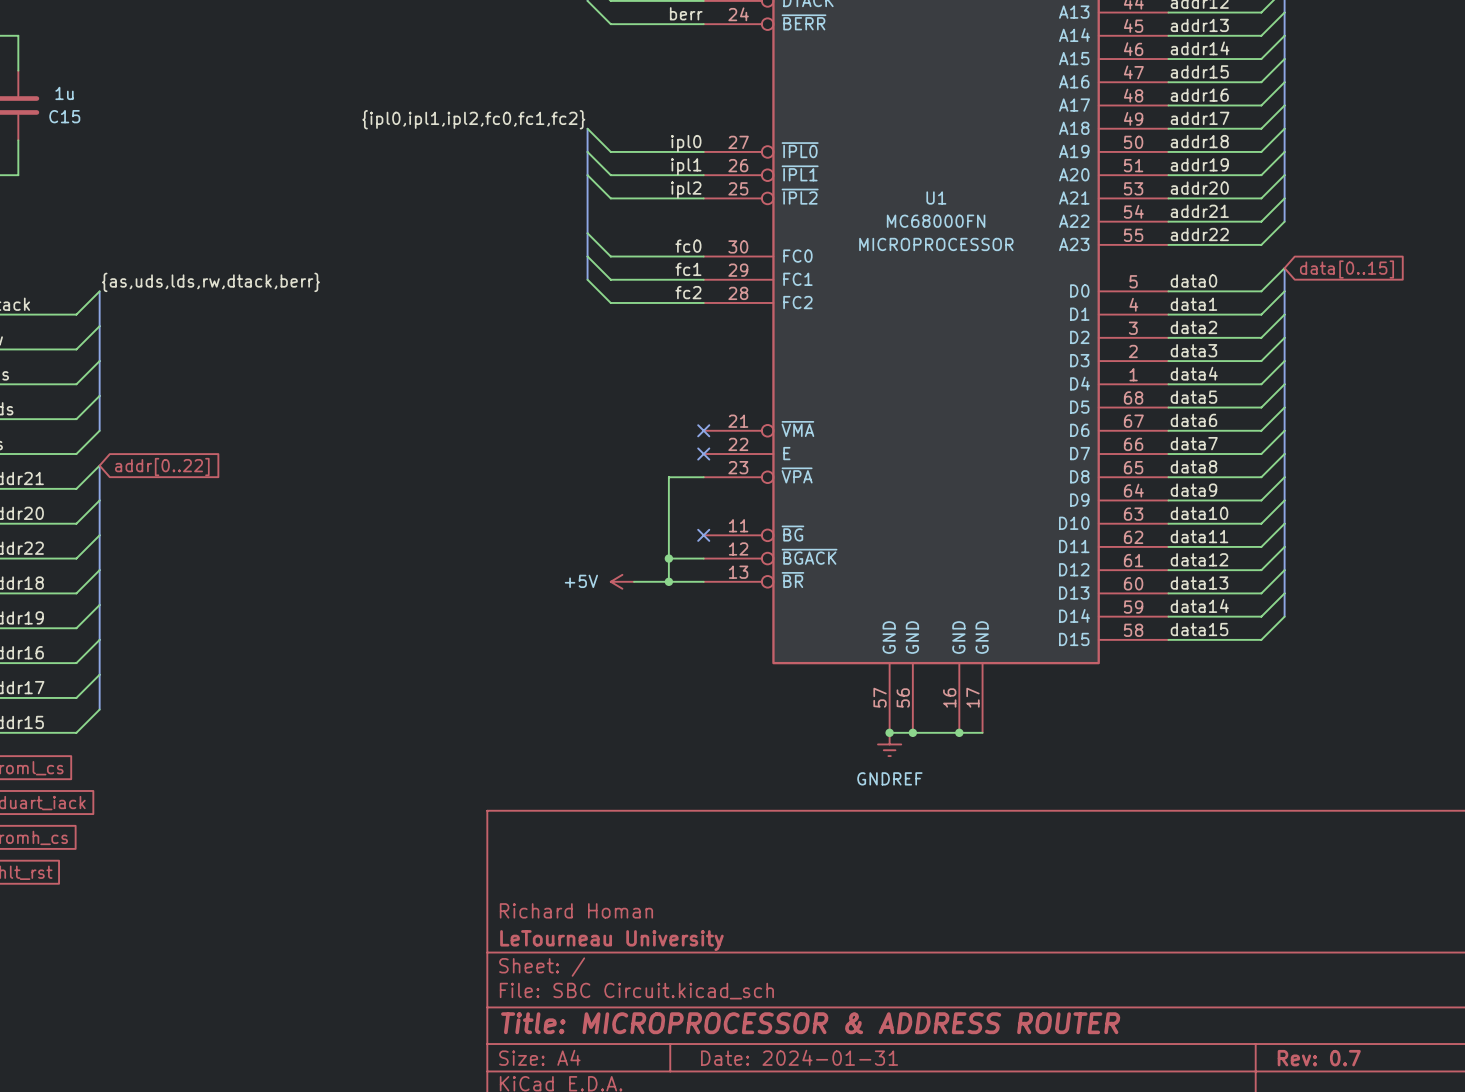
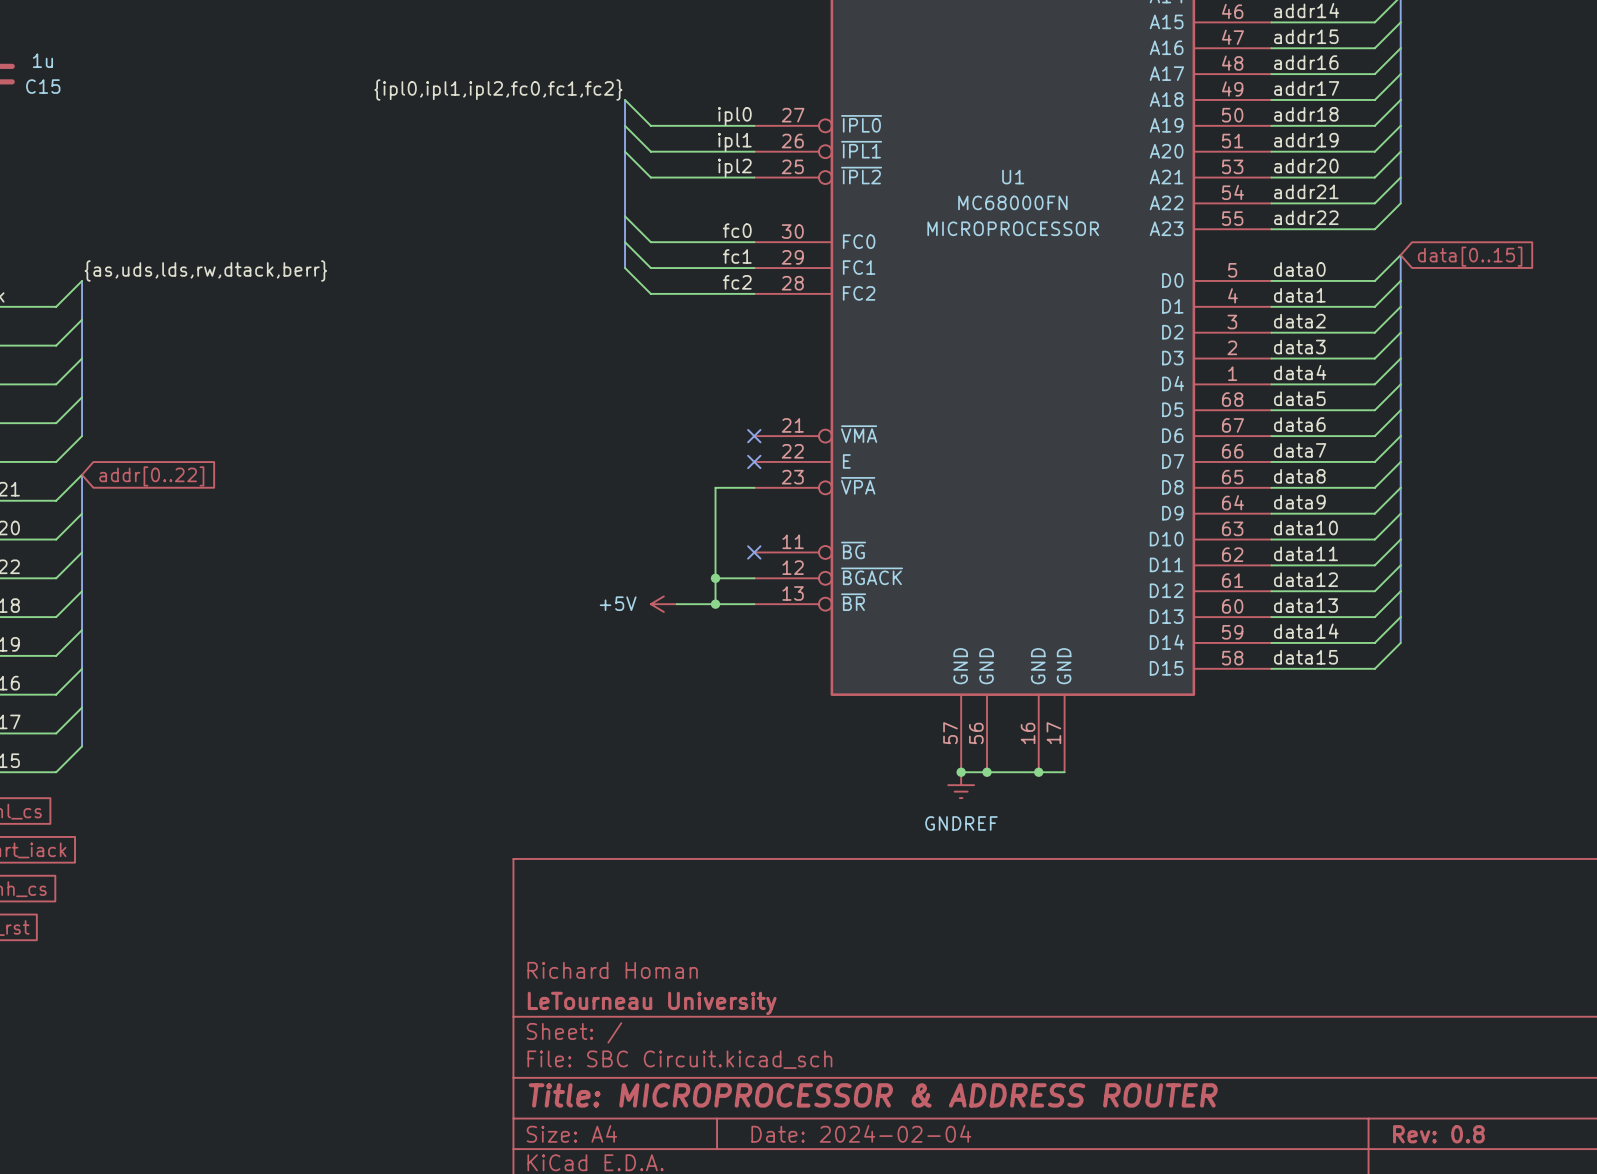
title block: Date: 2024-01-31 (799, 1057) -> Date: 2024-02-04 (861, 1133)
title block: Rev: 0.7 (1319, 1058) -> Rev: 0.8 (1438, 1134)

